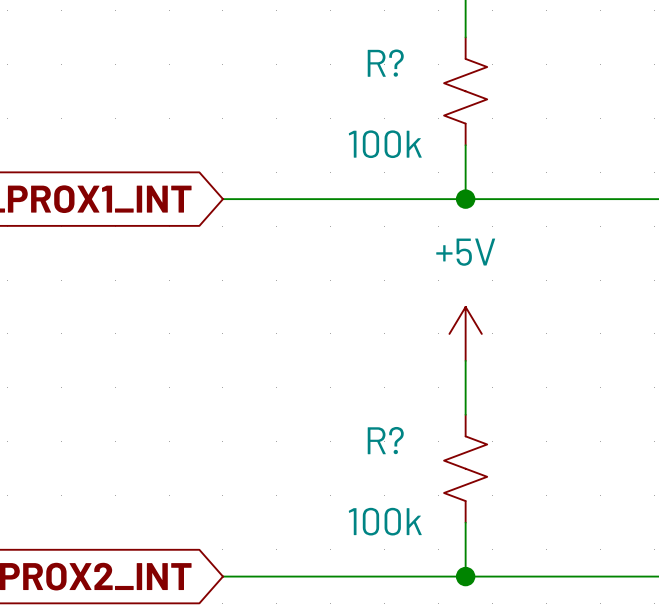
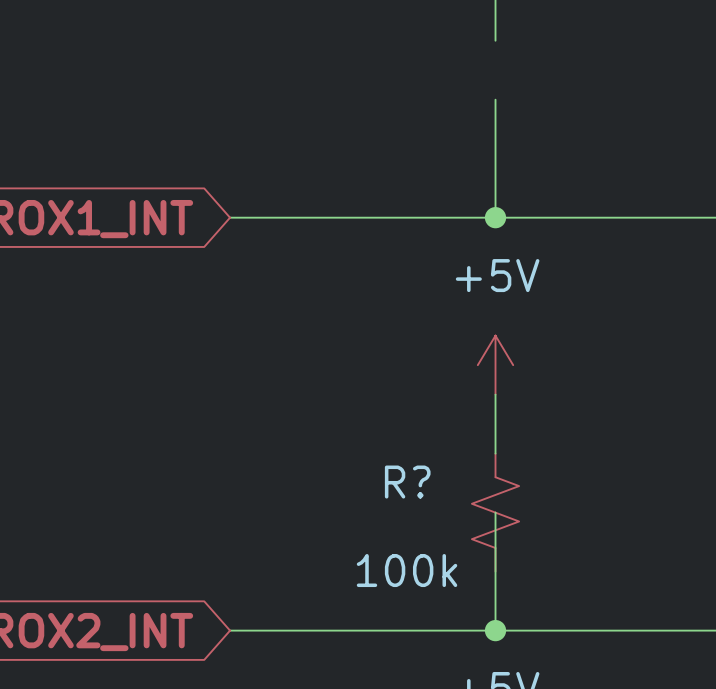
wire: none -> (495, 99) (495, 158)
R?: 100k (465, 91) -> none
wire: none -> (495, 512) (495, 571)

